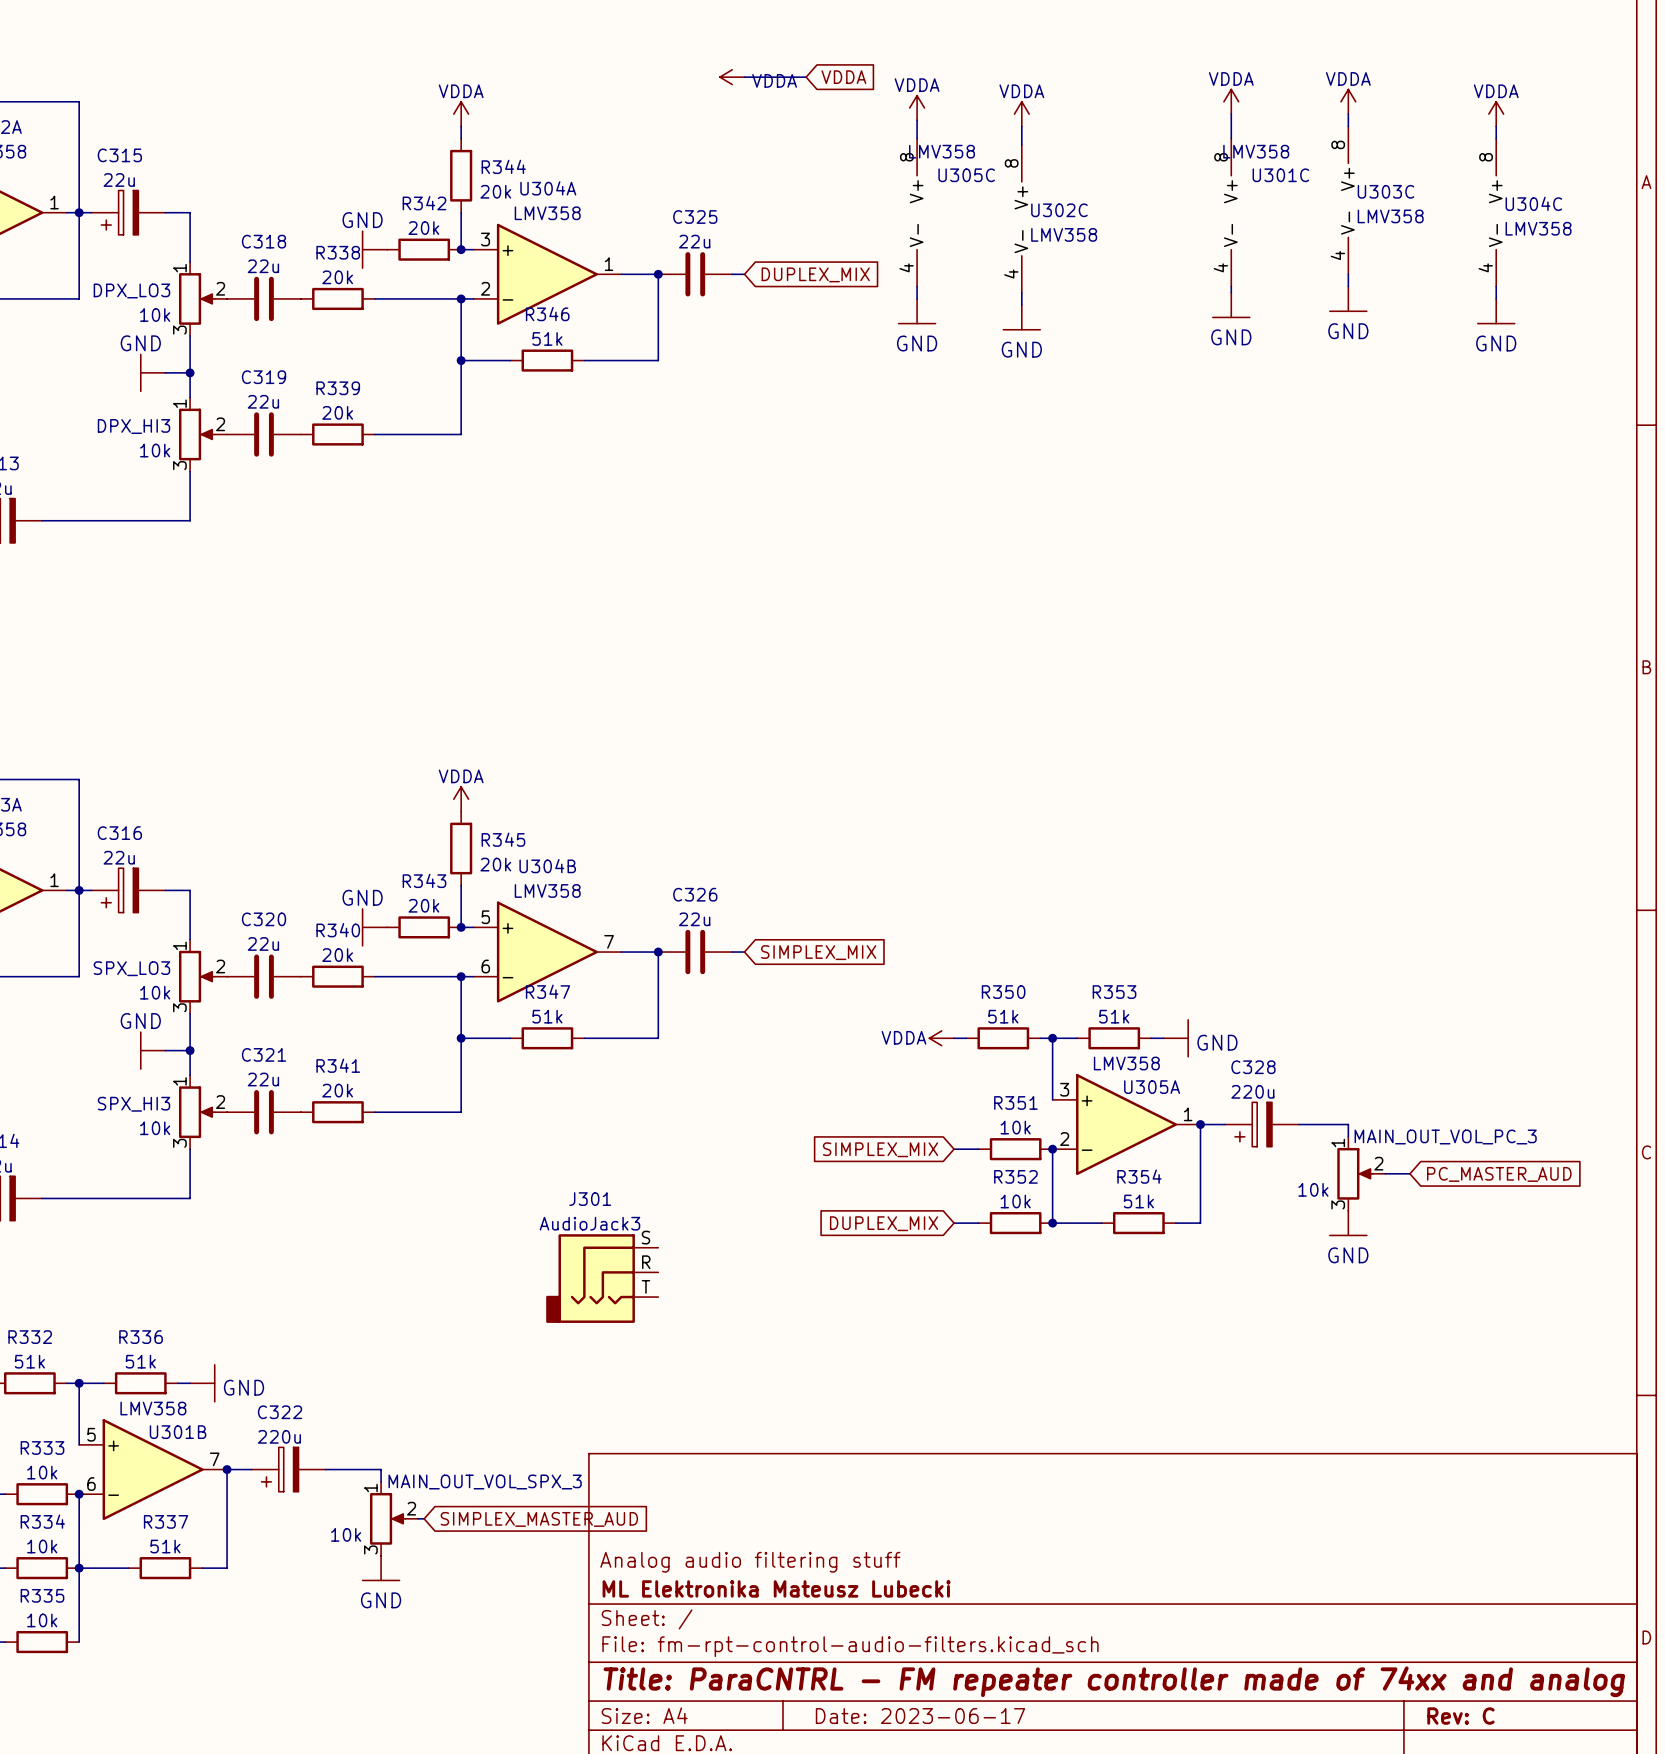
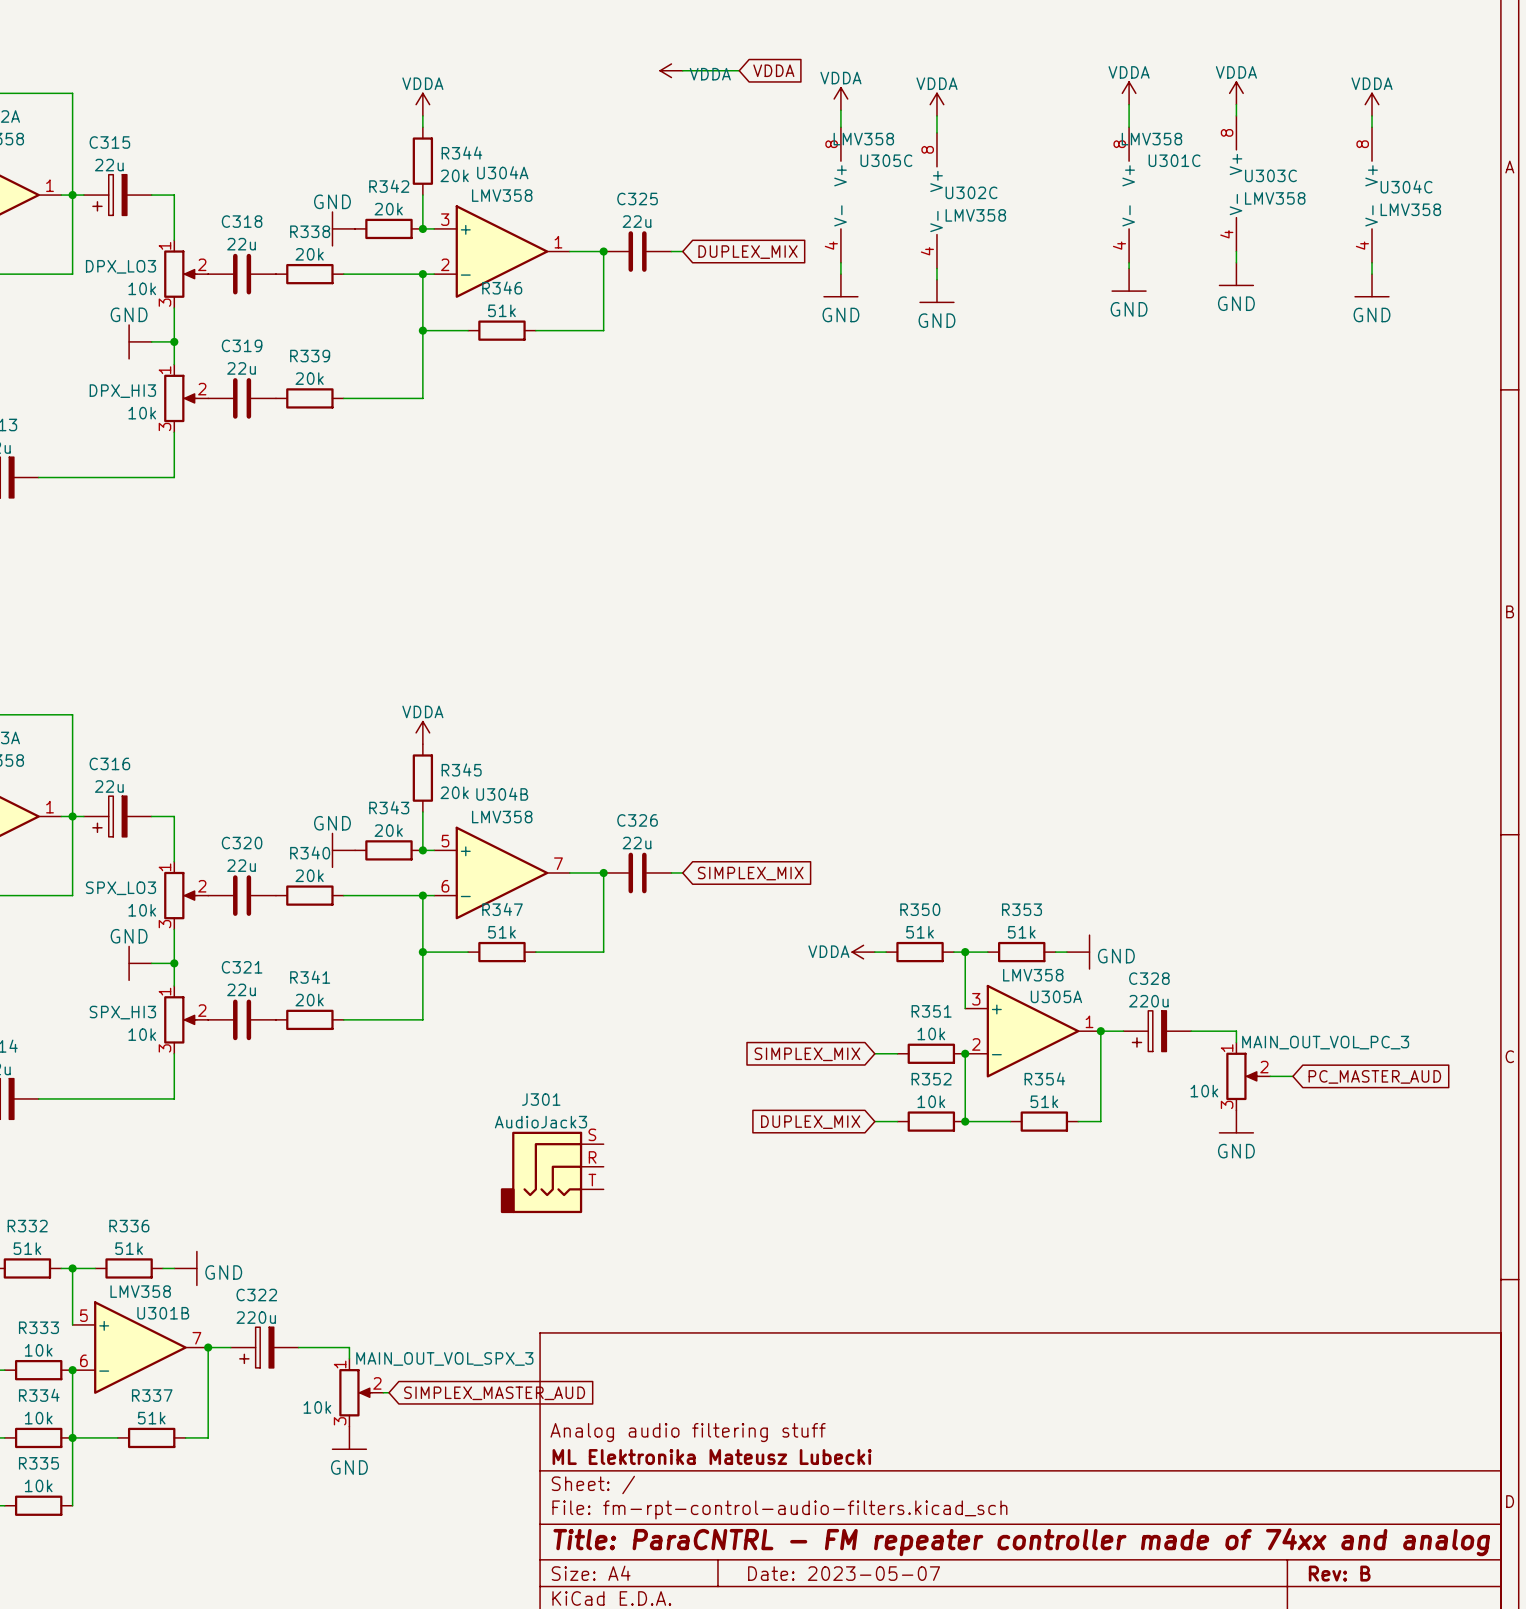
title block: Date: 2023-06-17 (920, 1716) -> Date: 2023-05-07 (844, 1573)
title block: Rev: C (1460, 1716) -> Rev: B (1339, 1573)

